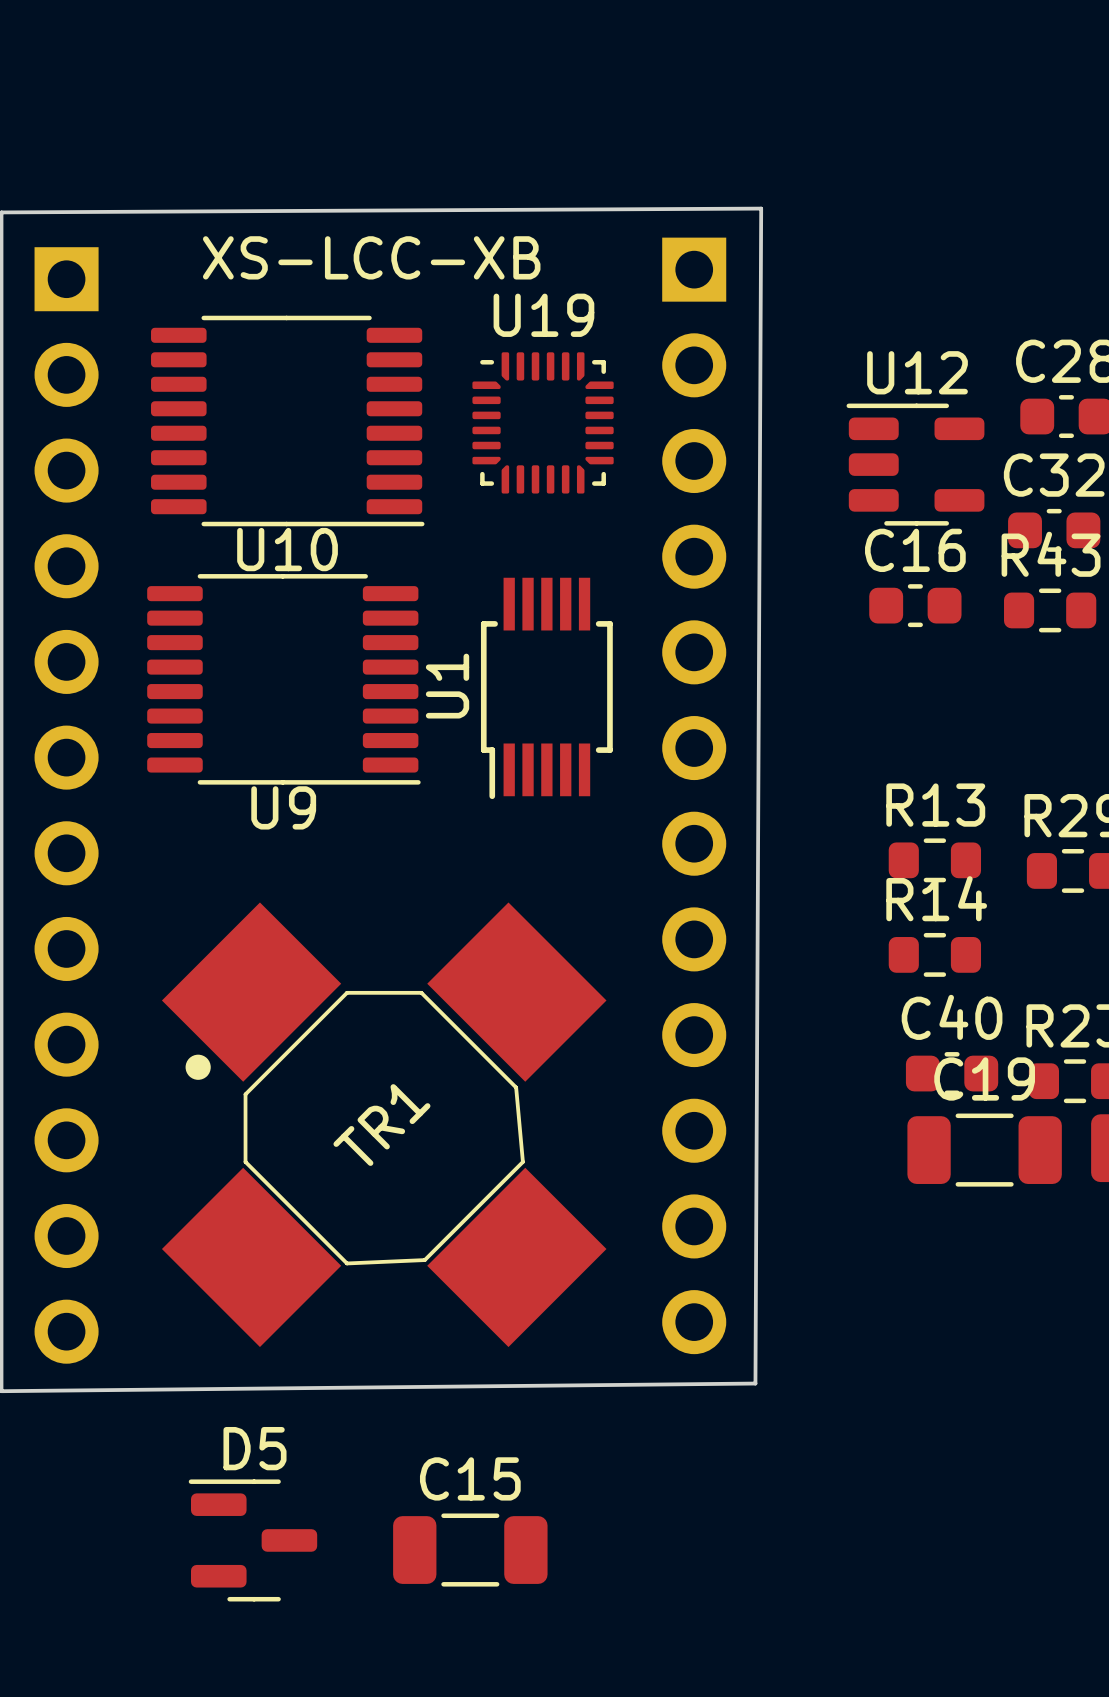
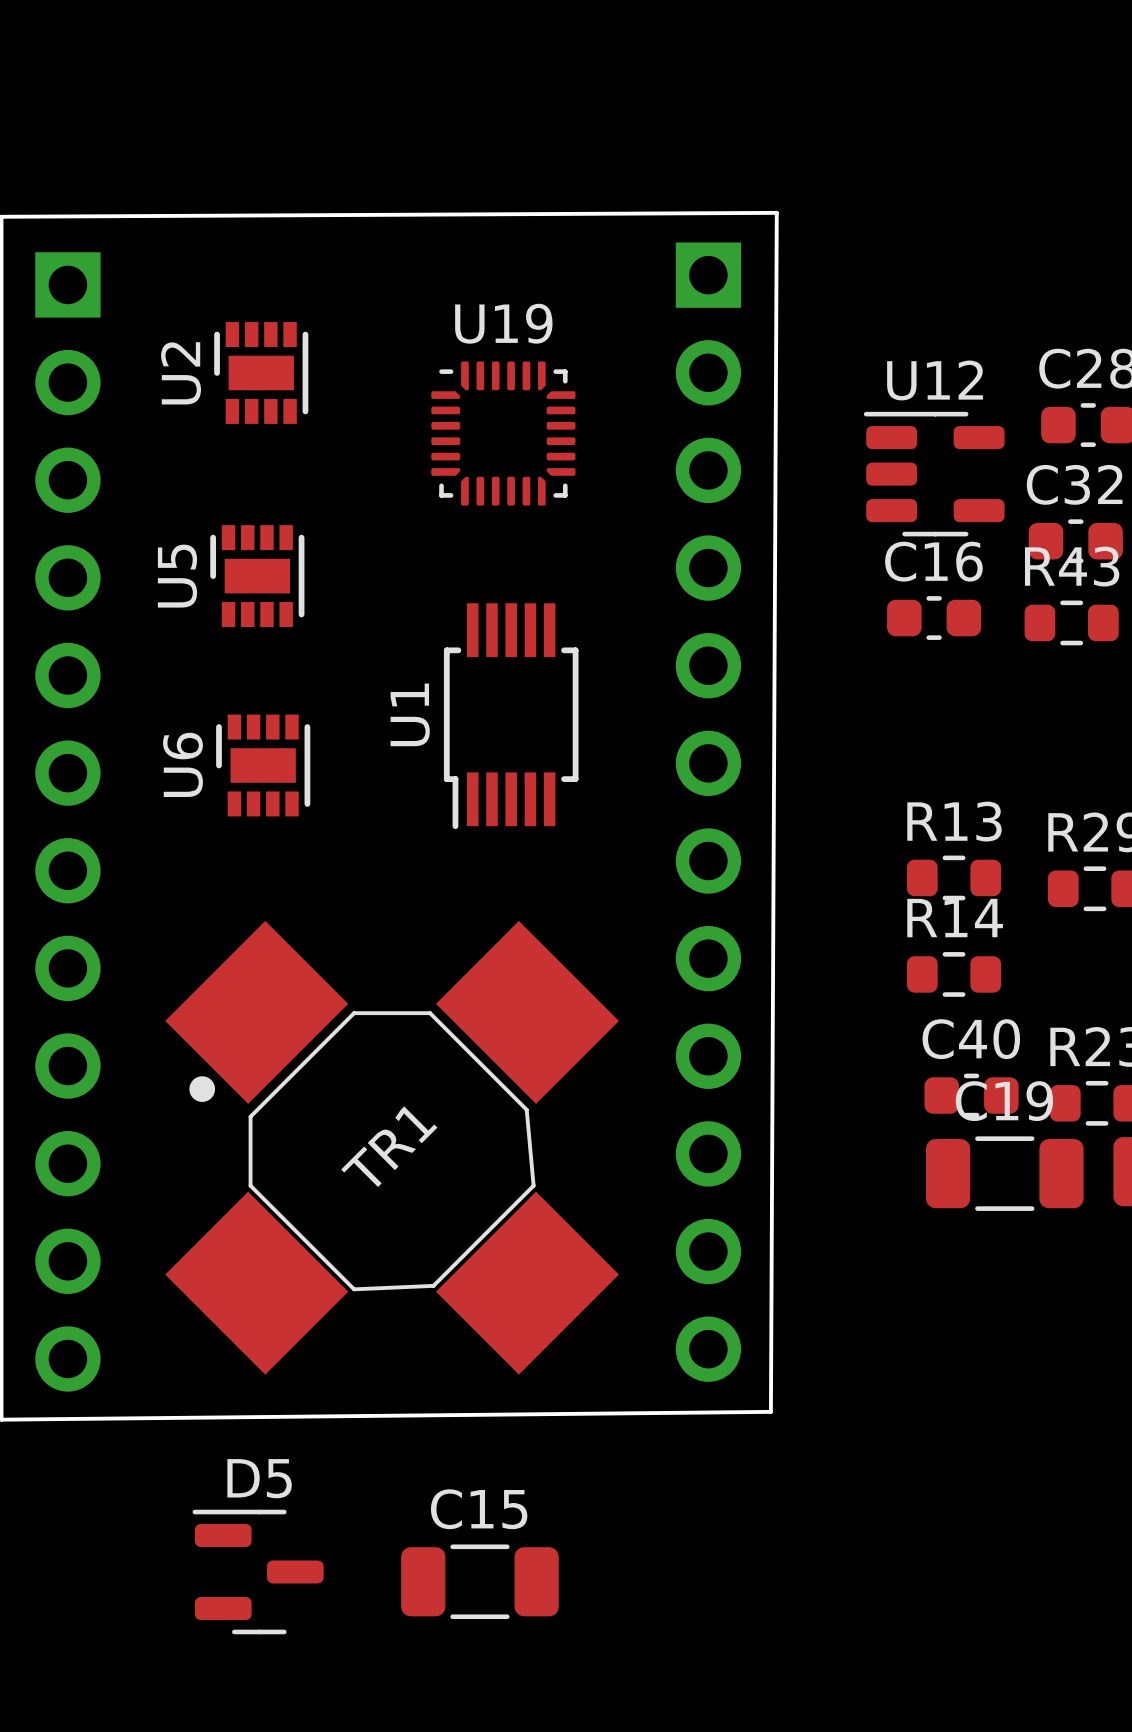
text: XS-LCC-XB (371, 257) -> none
U2: none -> (261, 372)
U10: (287, 421) -> none
U19 position: (543, 422) -> (503, 433)
U5: none -> (257, 576)
U9: (283, 679) -> none
U1 position: (546, 688) -> (511, 716)
U6: none -> (263, 765)

